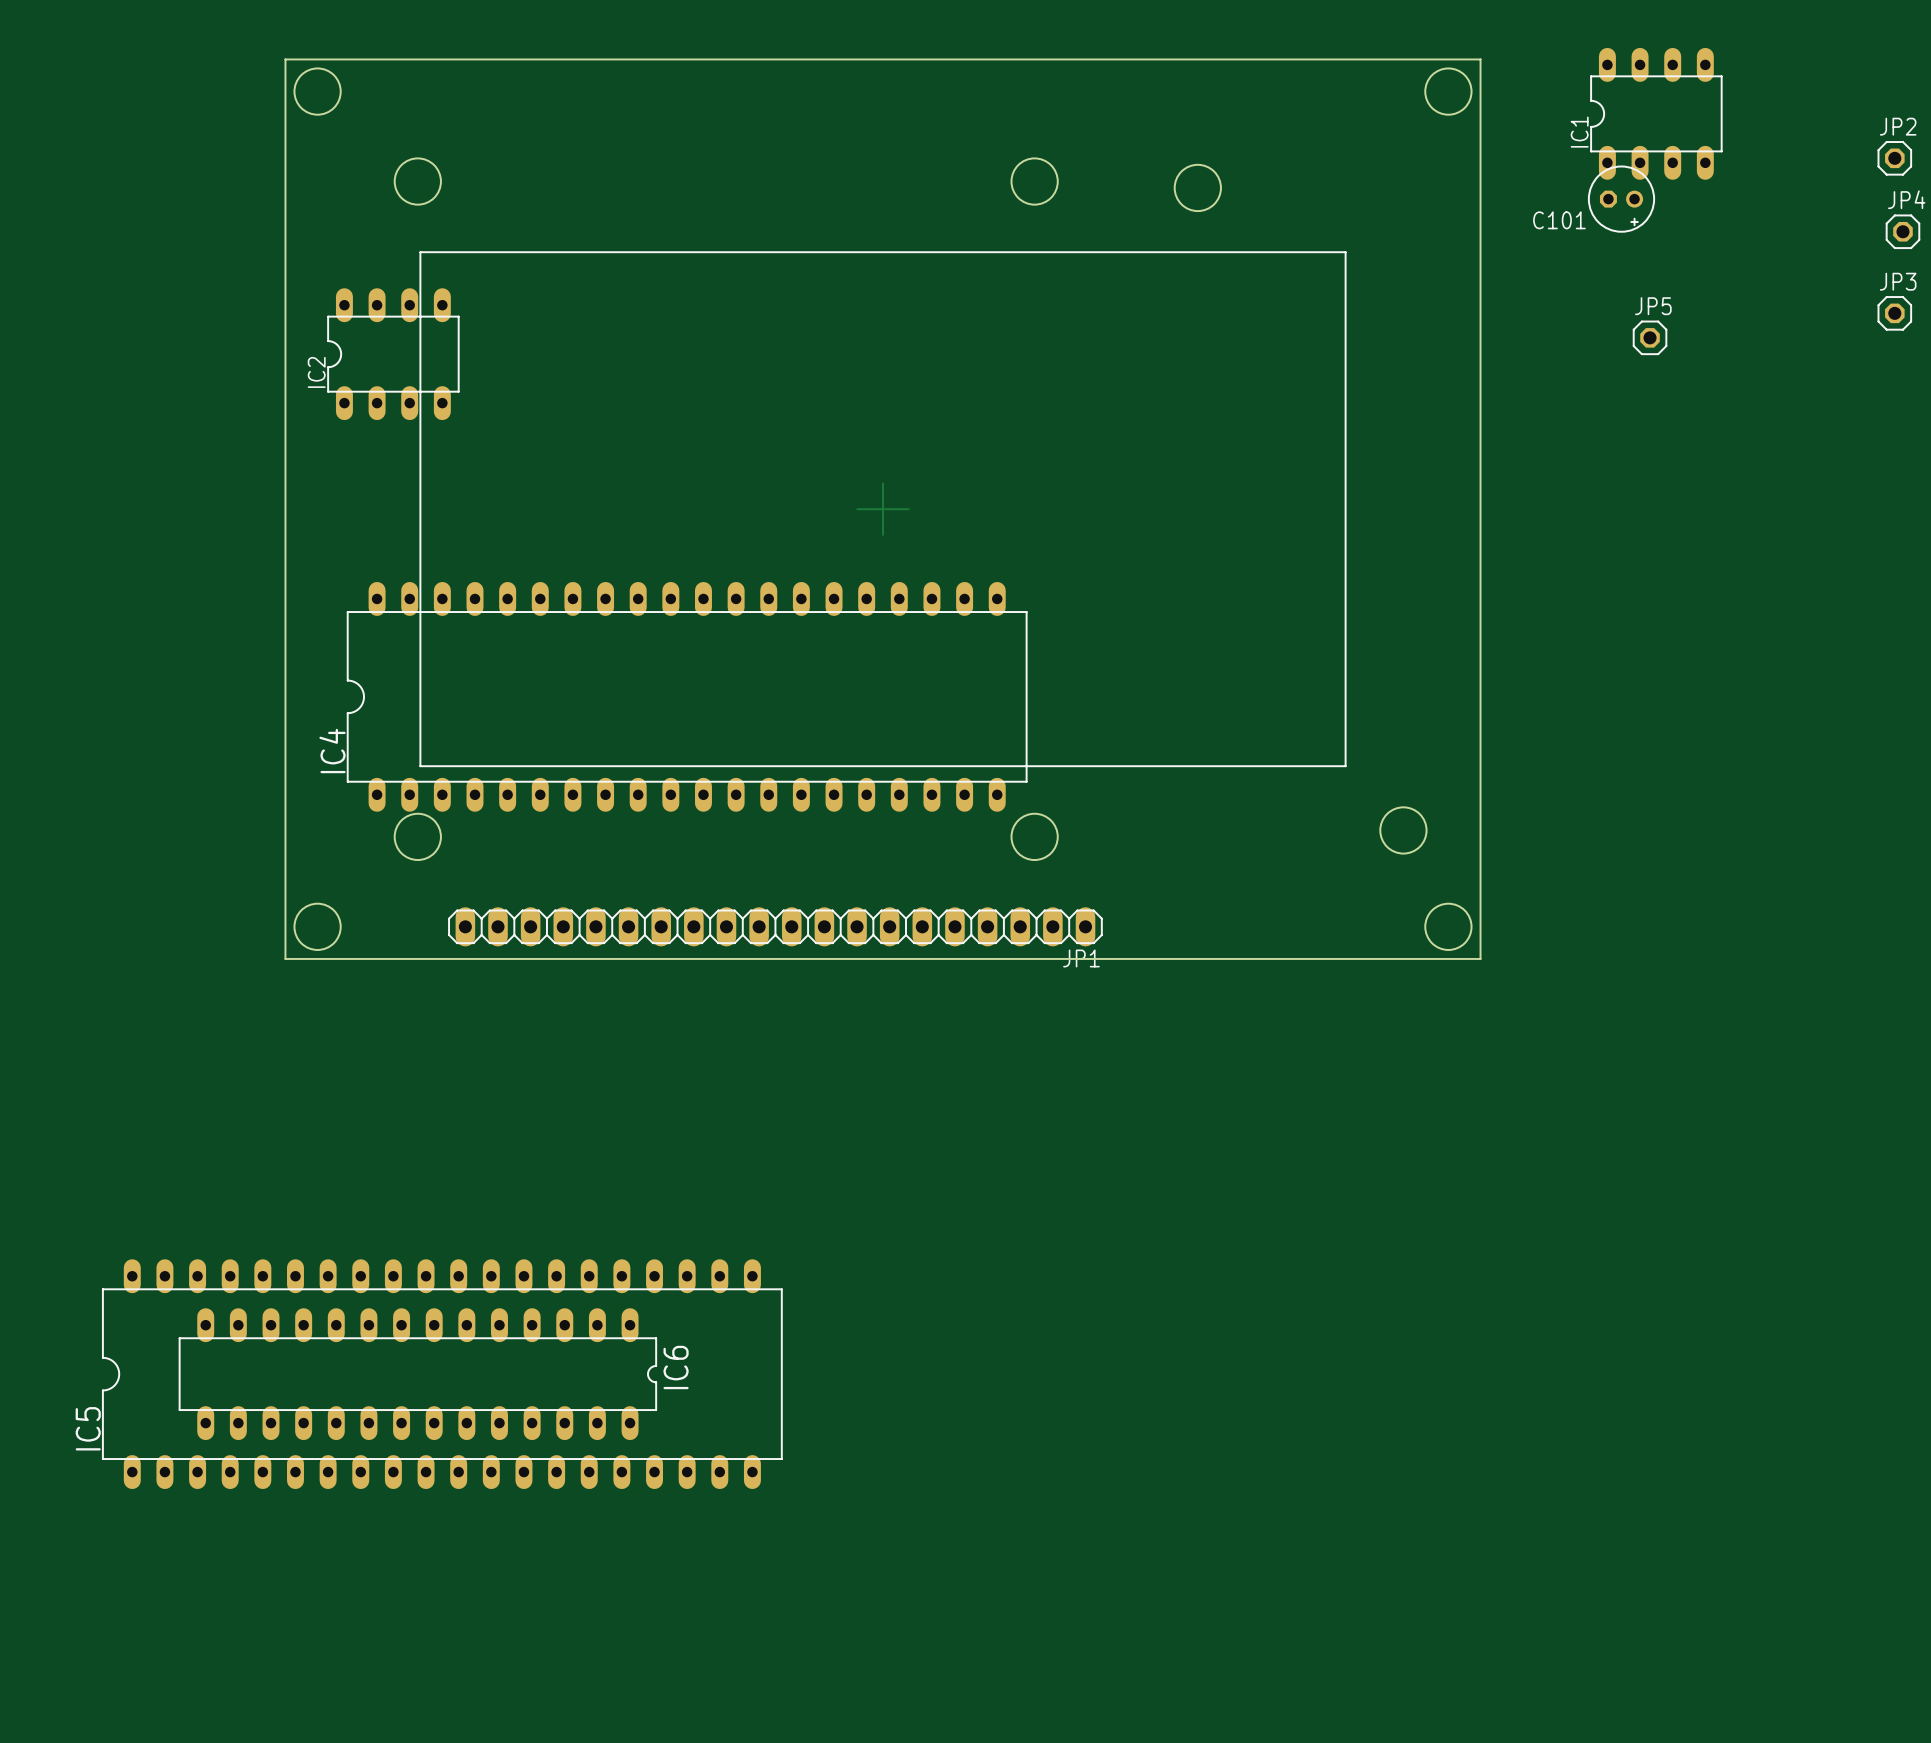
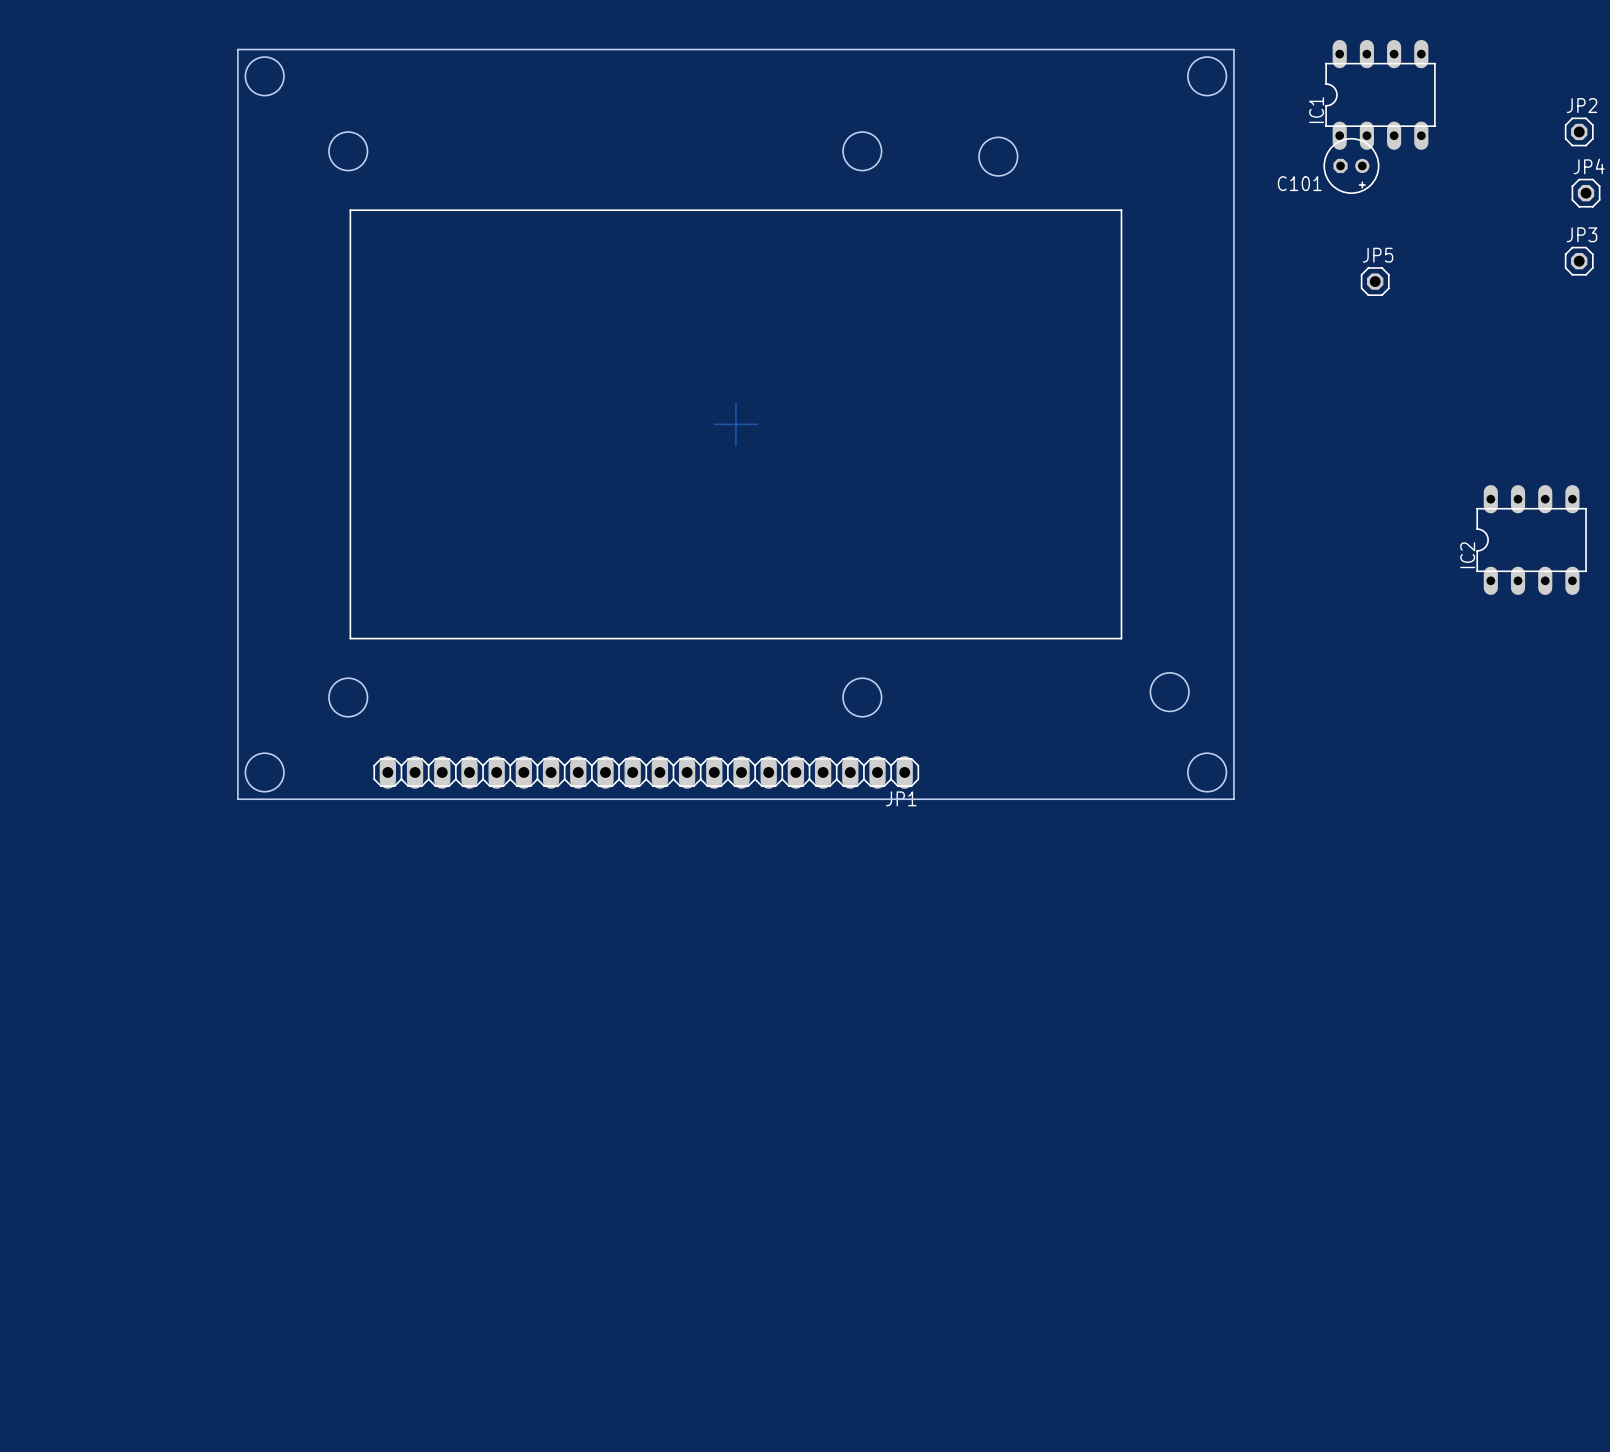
IC2 position: (393, 354) -> (1531, 540)
IC4: (687, 696) -> none
IC6: (417, 1374) -> none
IC5: (442, 1374) -> none

